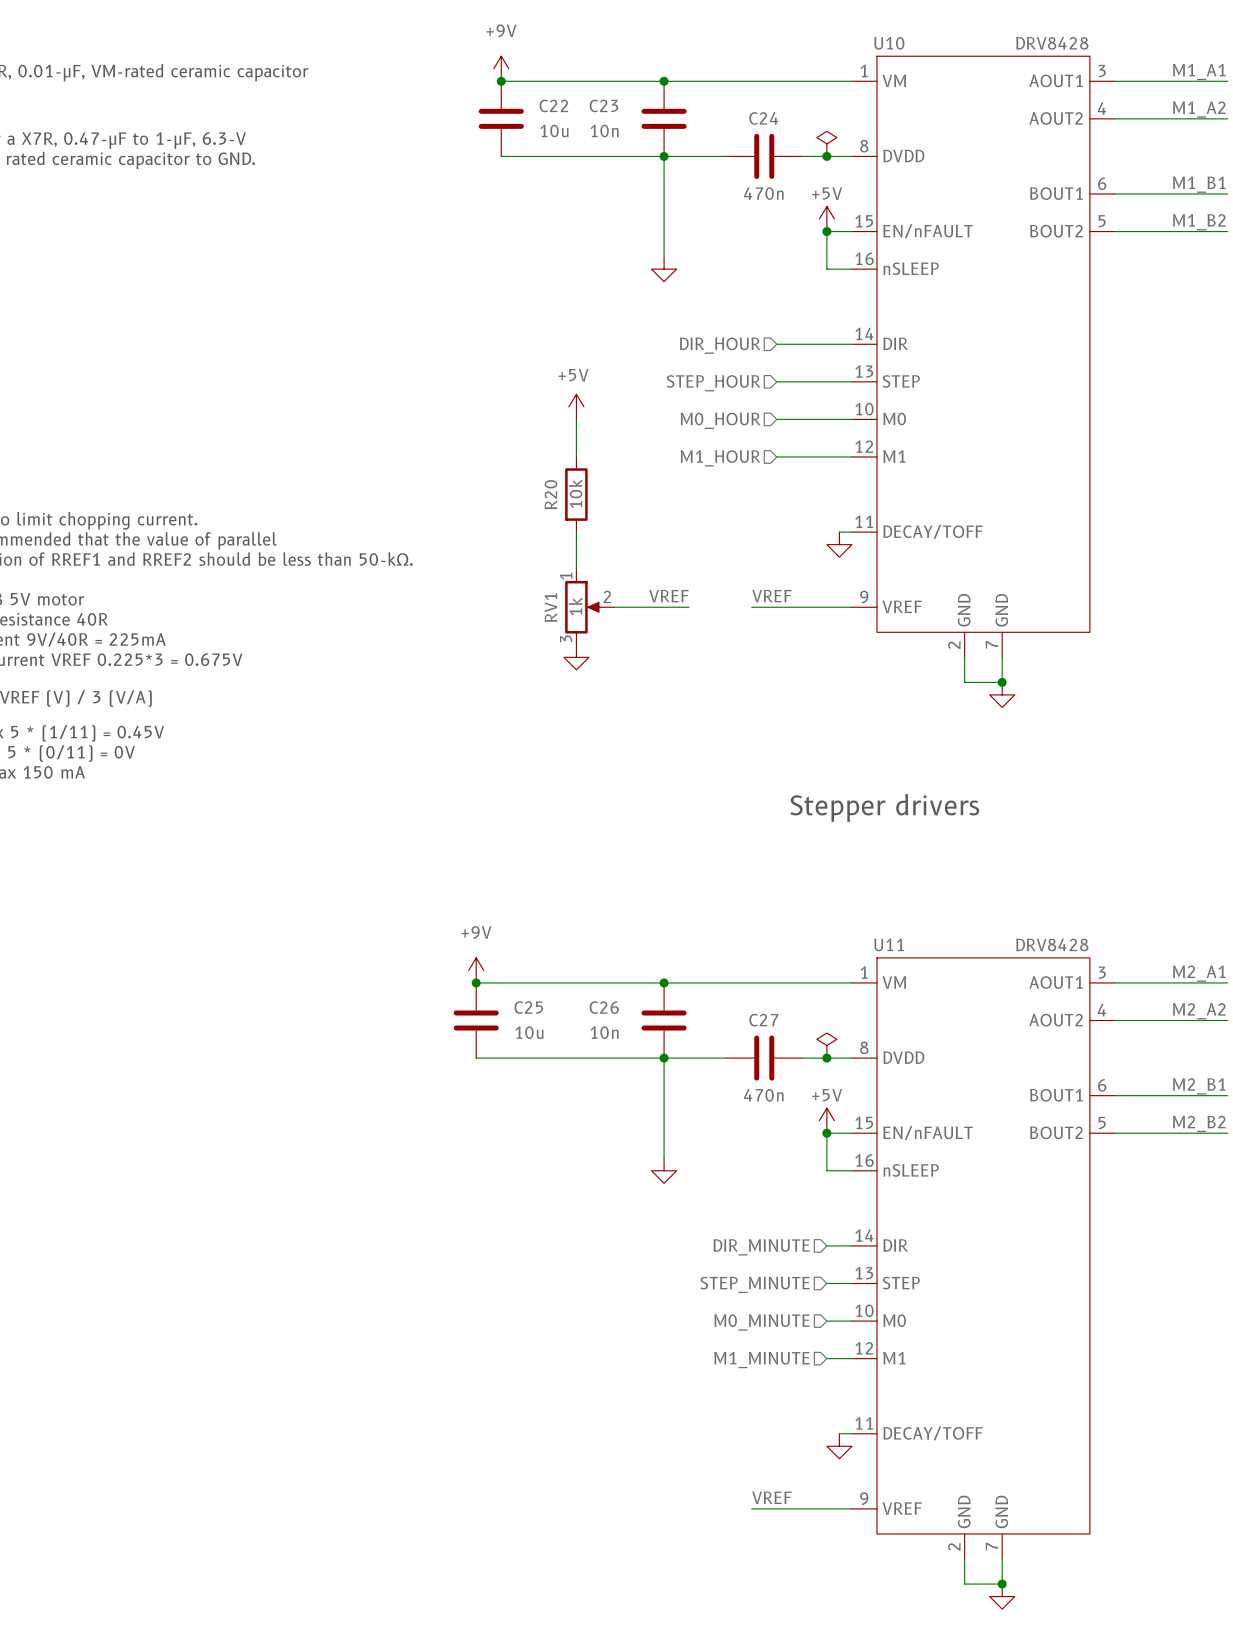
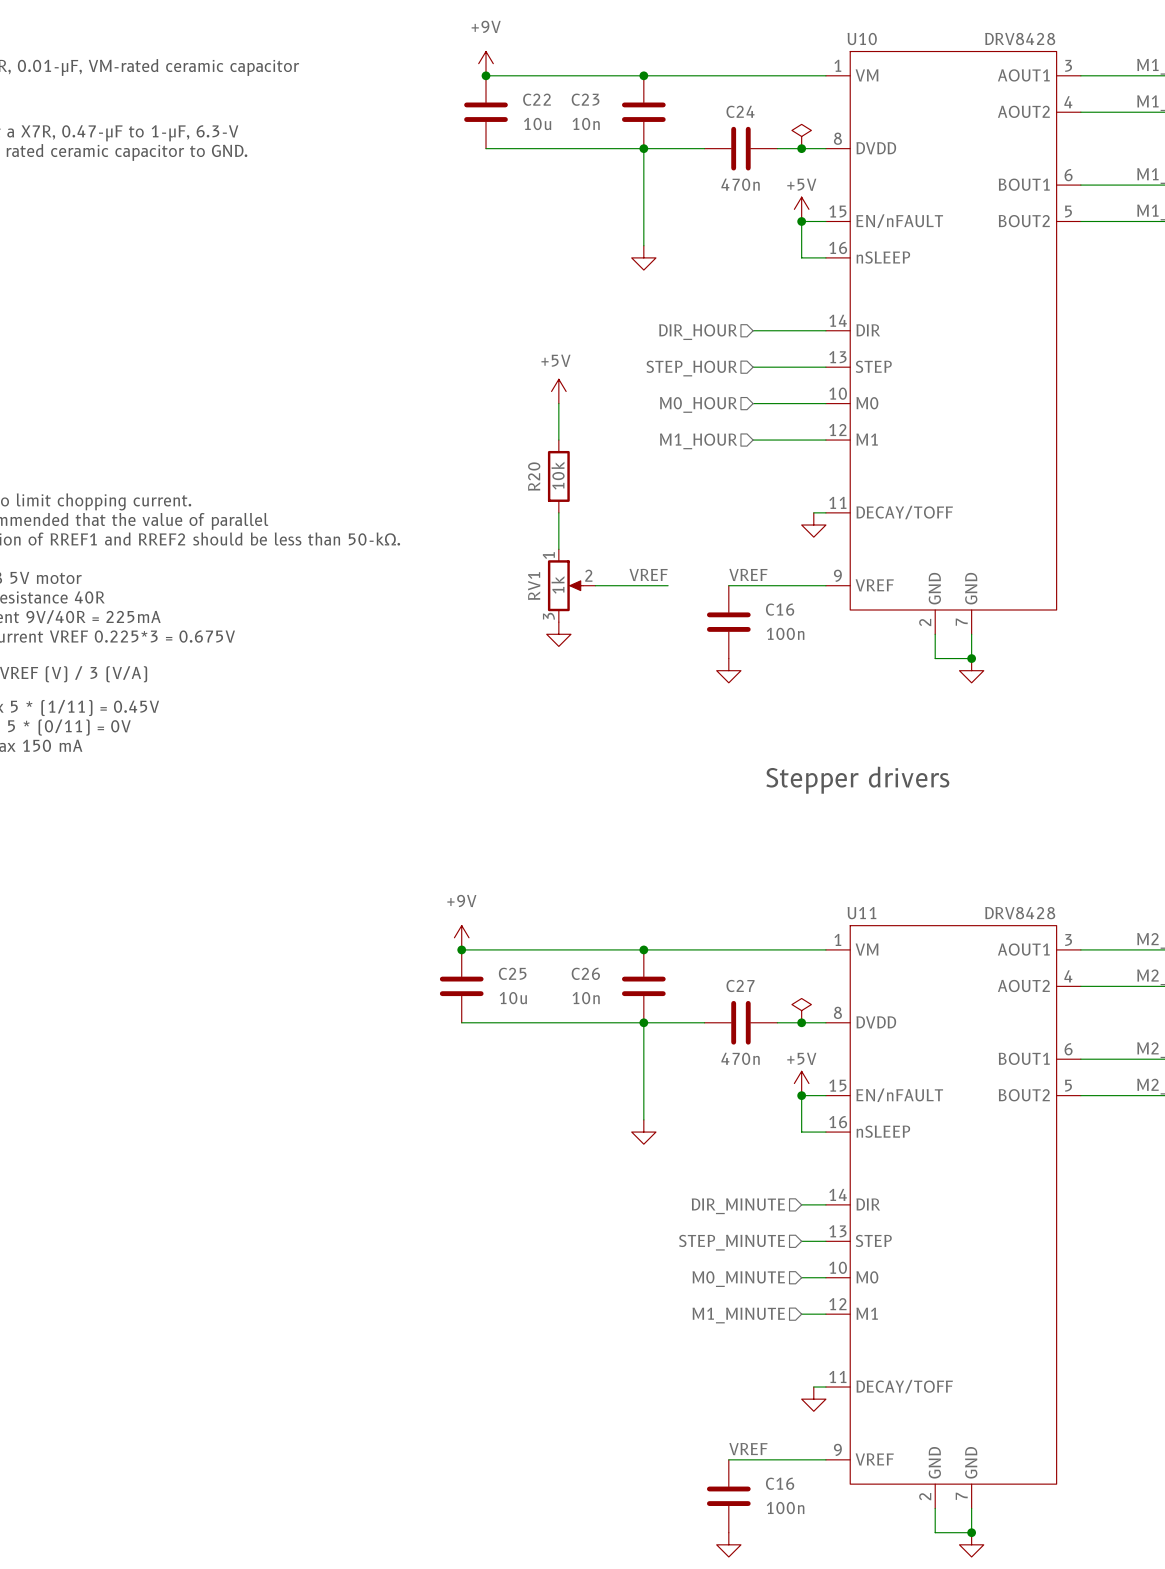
C16: none -> 100n (728, 622)
power symbol: none -> (728, 670)
C16: none -> 100n (728, 1496)
power symbol: none -> (728, 1544)

